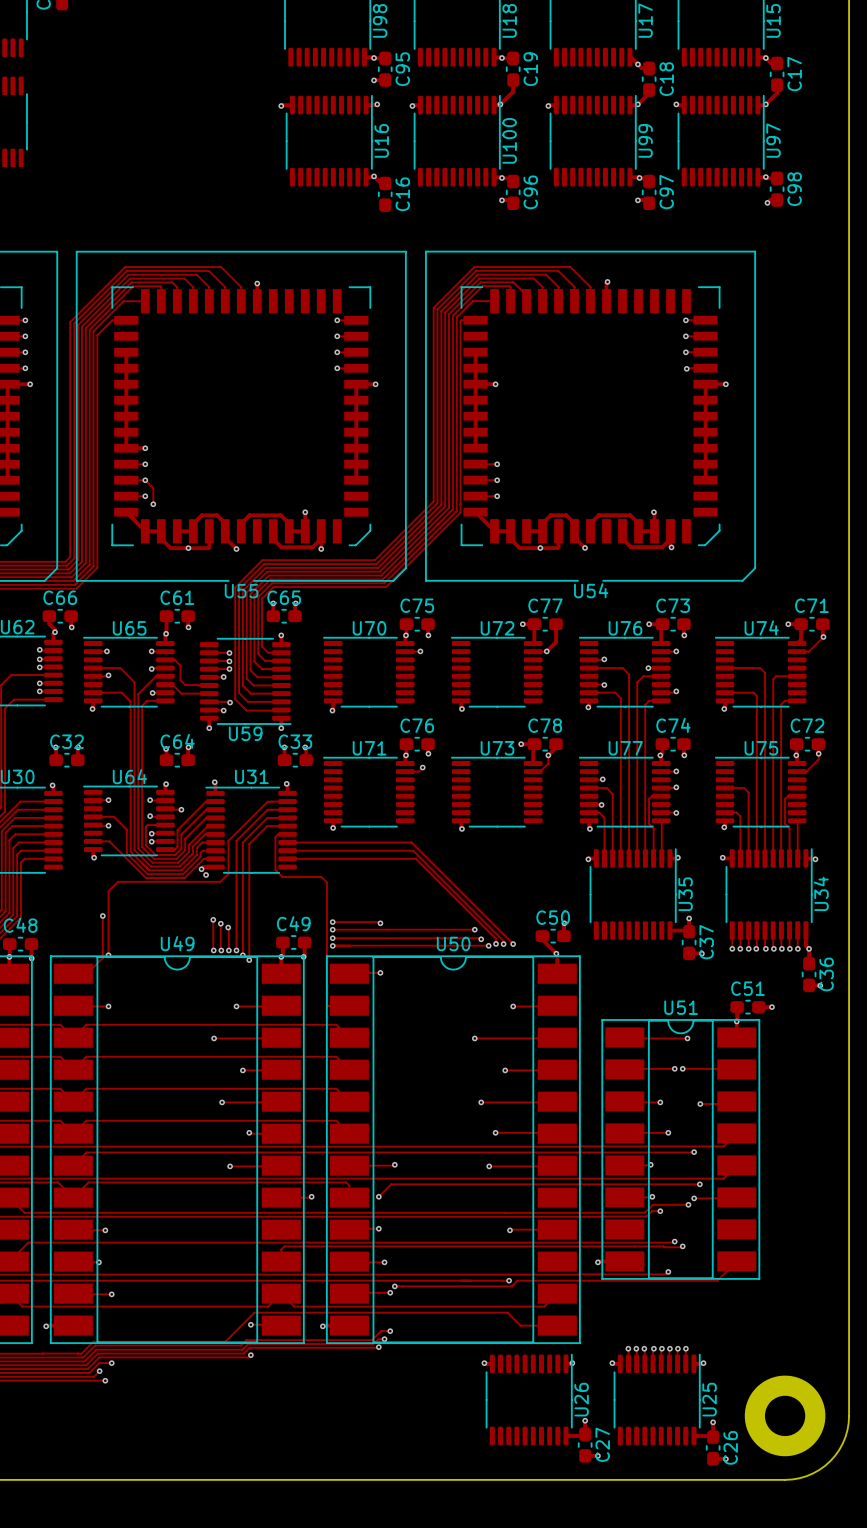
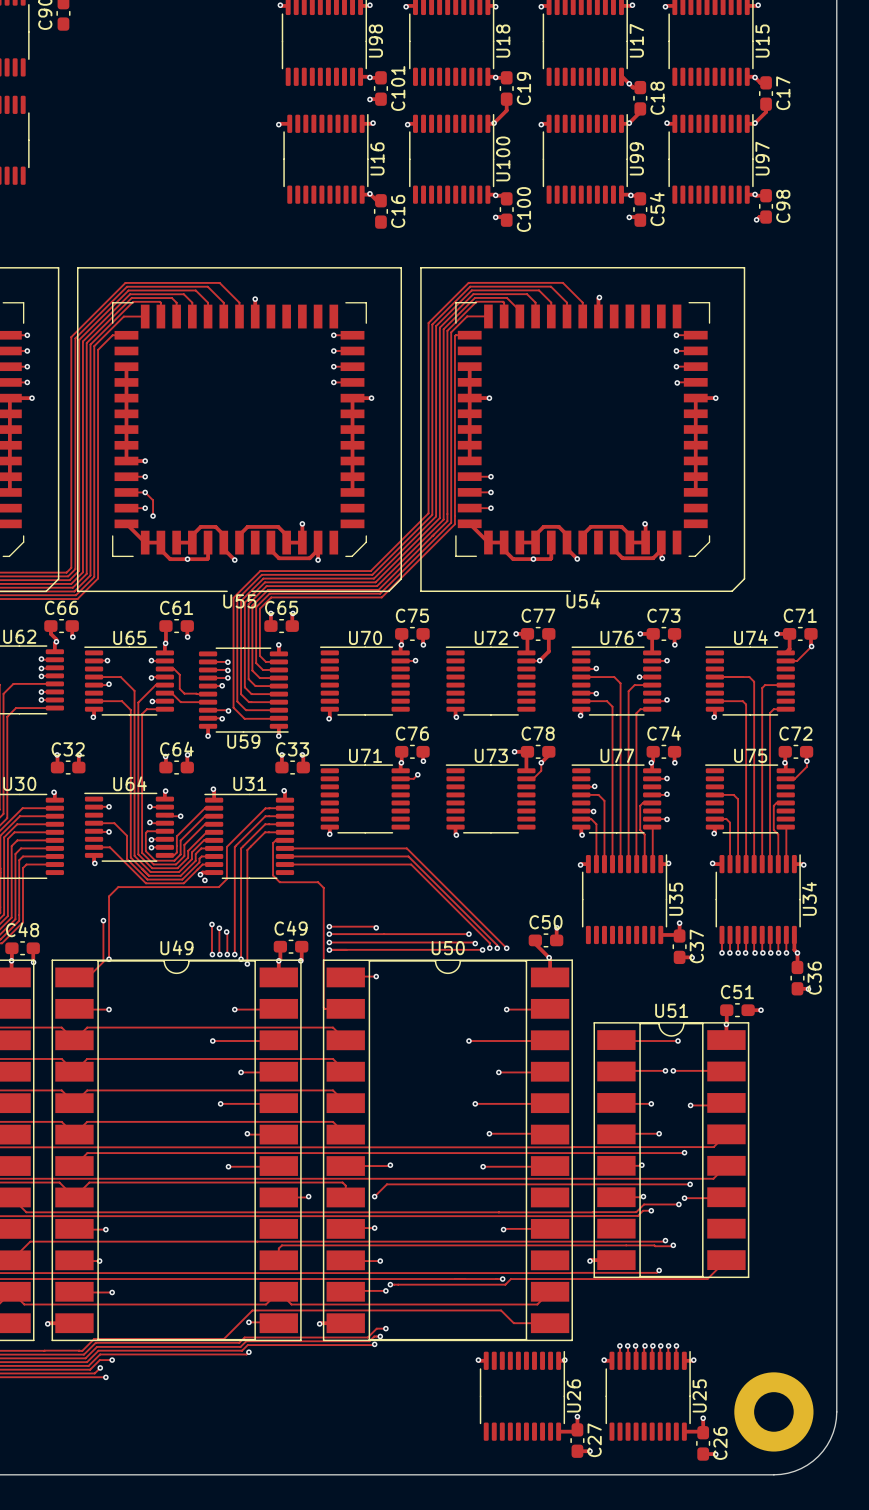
C95 name: C95 (402, 69) -> C101 (398, 88)
C96 name: C96 (530, 192) -> C100 (523, 209)
C97 name: C97 (666, 192) -> C54 (657, 209)

